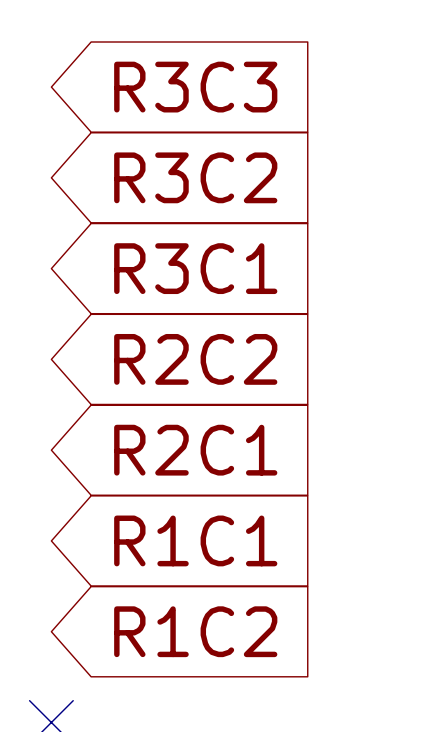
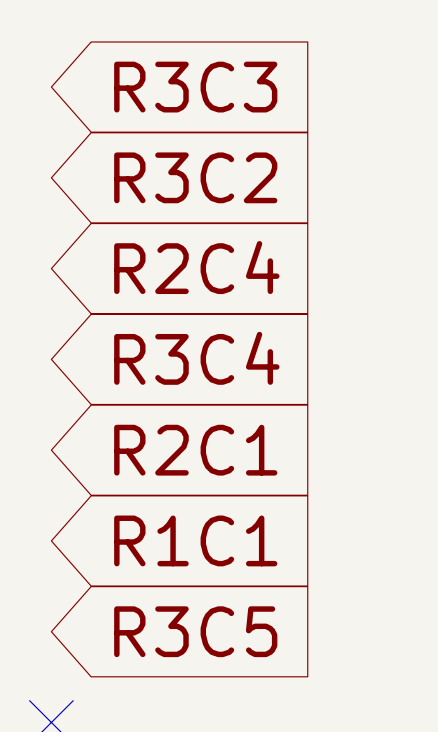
global label: R3C1 (195, 268) -> R2C4 (196, 267)
global label: R2C2 (195, 359) -> R3C4 (196, 358)
global label: R1C2 (195, 631) -> R3C5 (195, 631)

